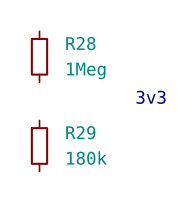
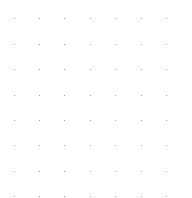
R28: 1Meg (39, 56) -> none
text: 3v3 (151, 97) -> none
R29: 180k (39, 145) -> none

